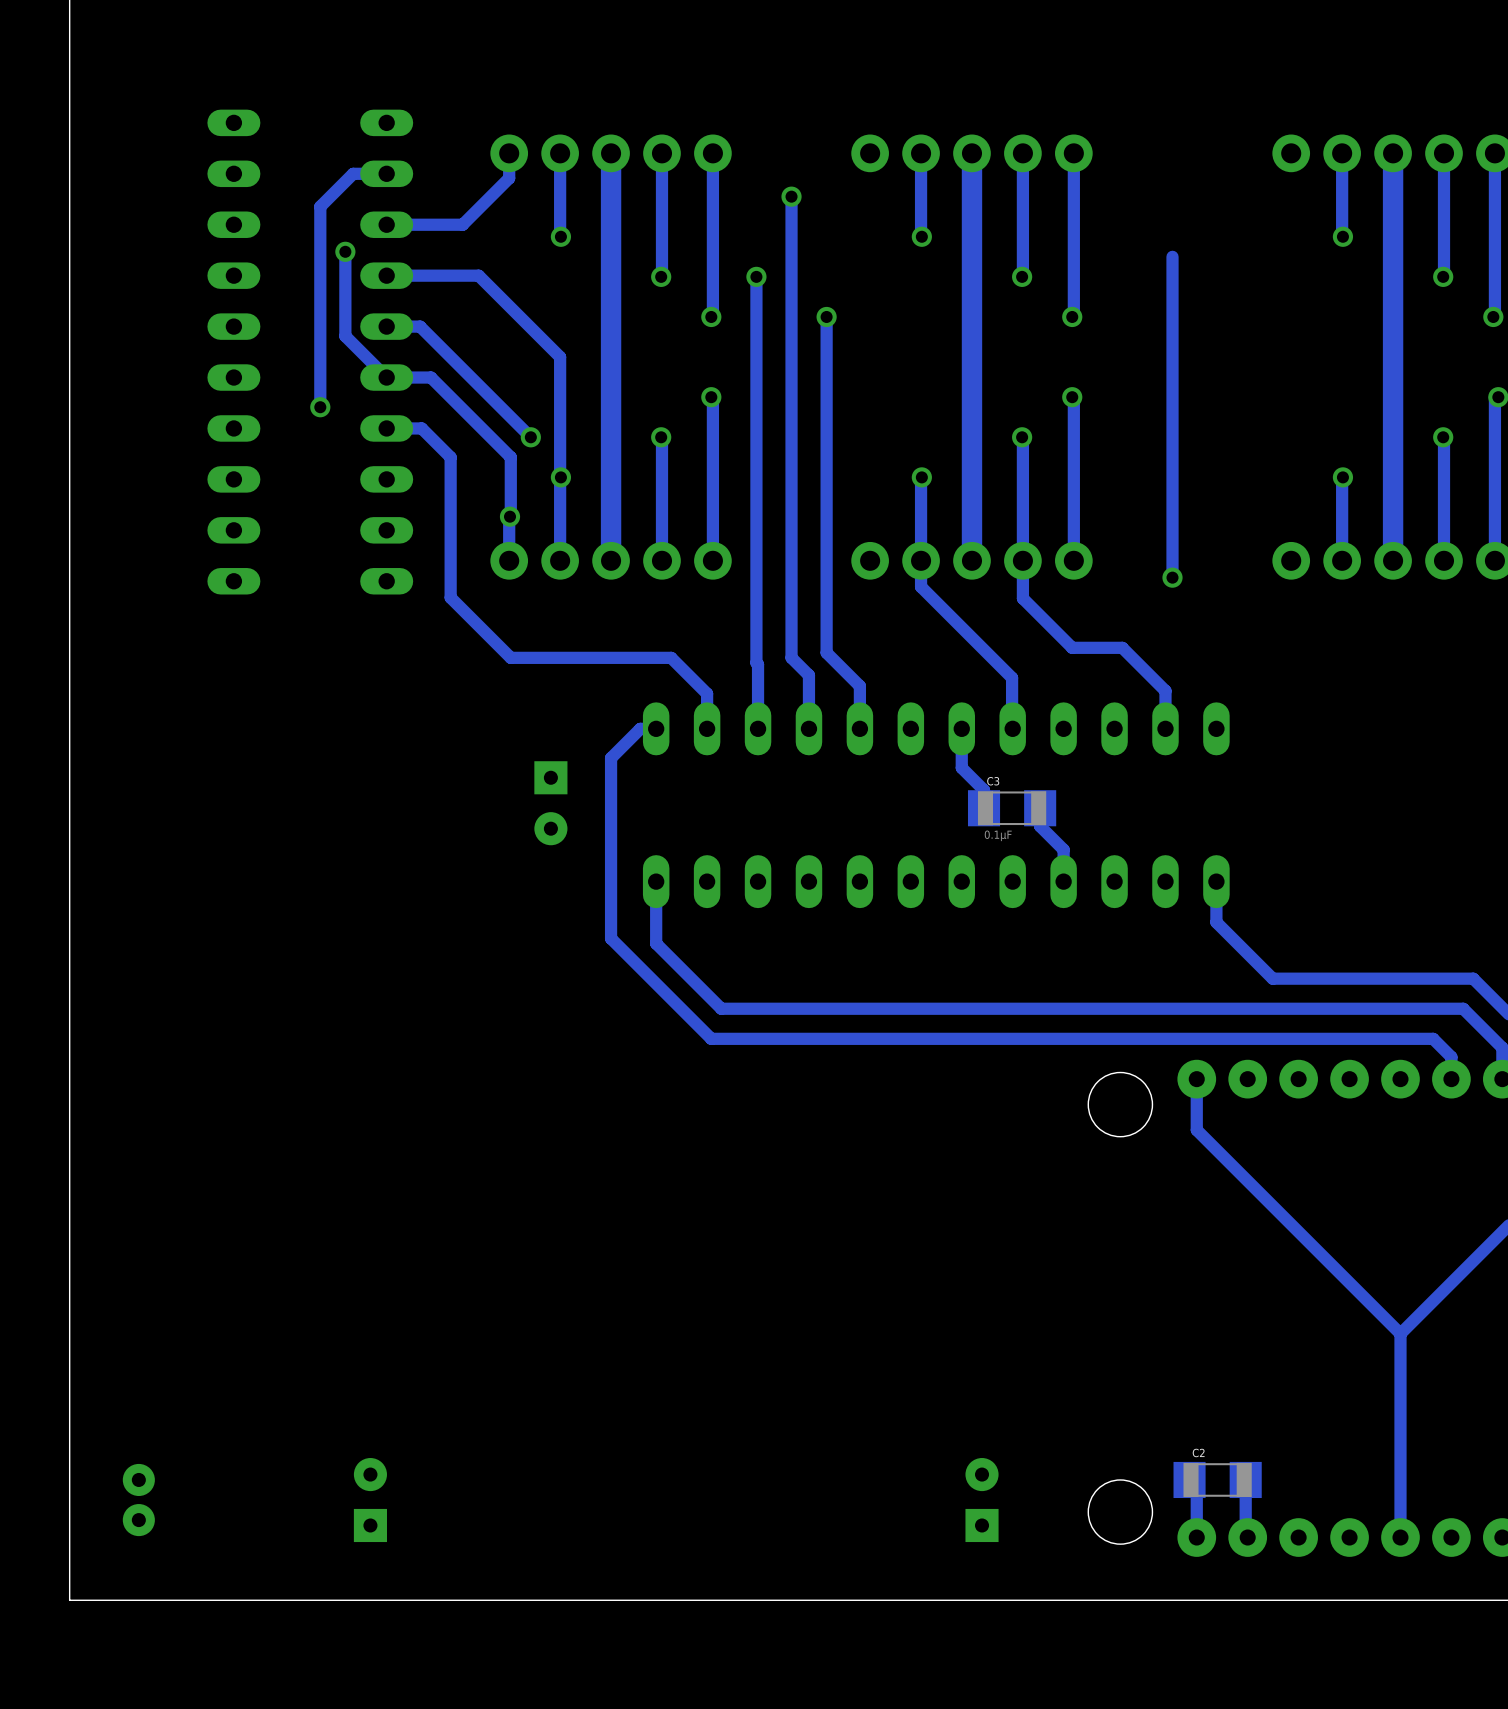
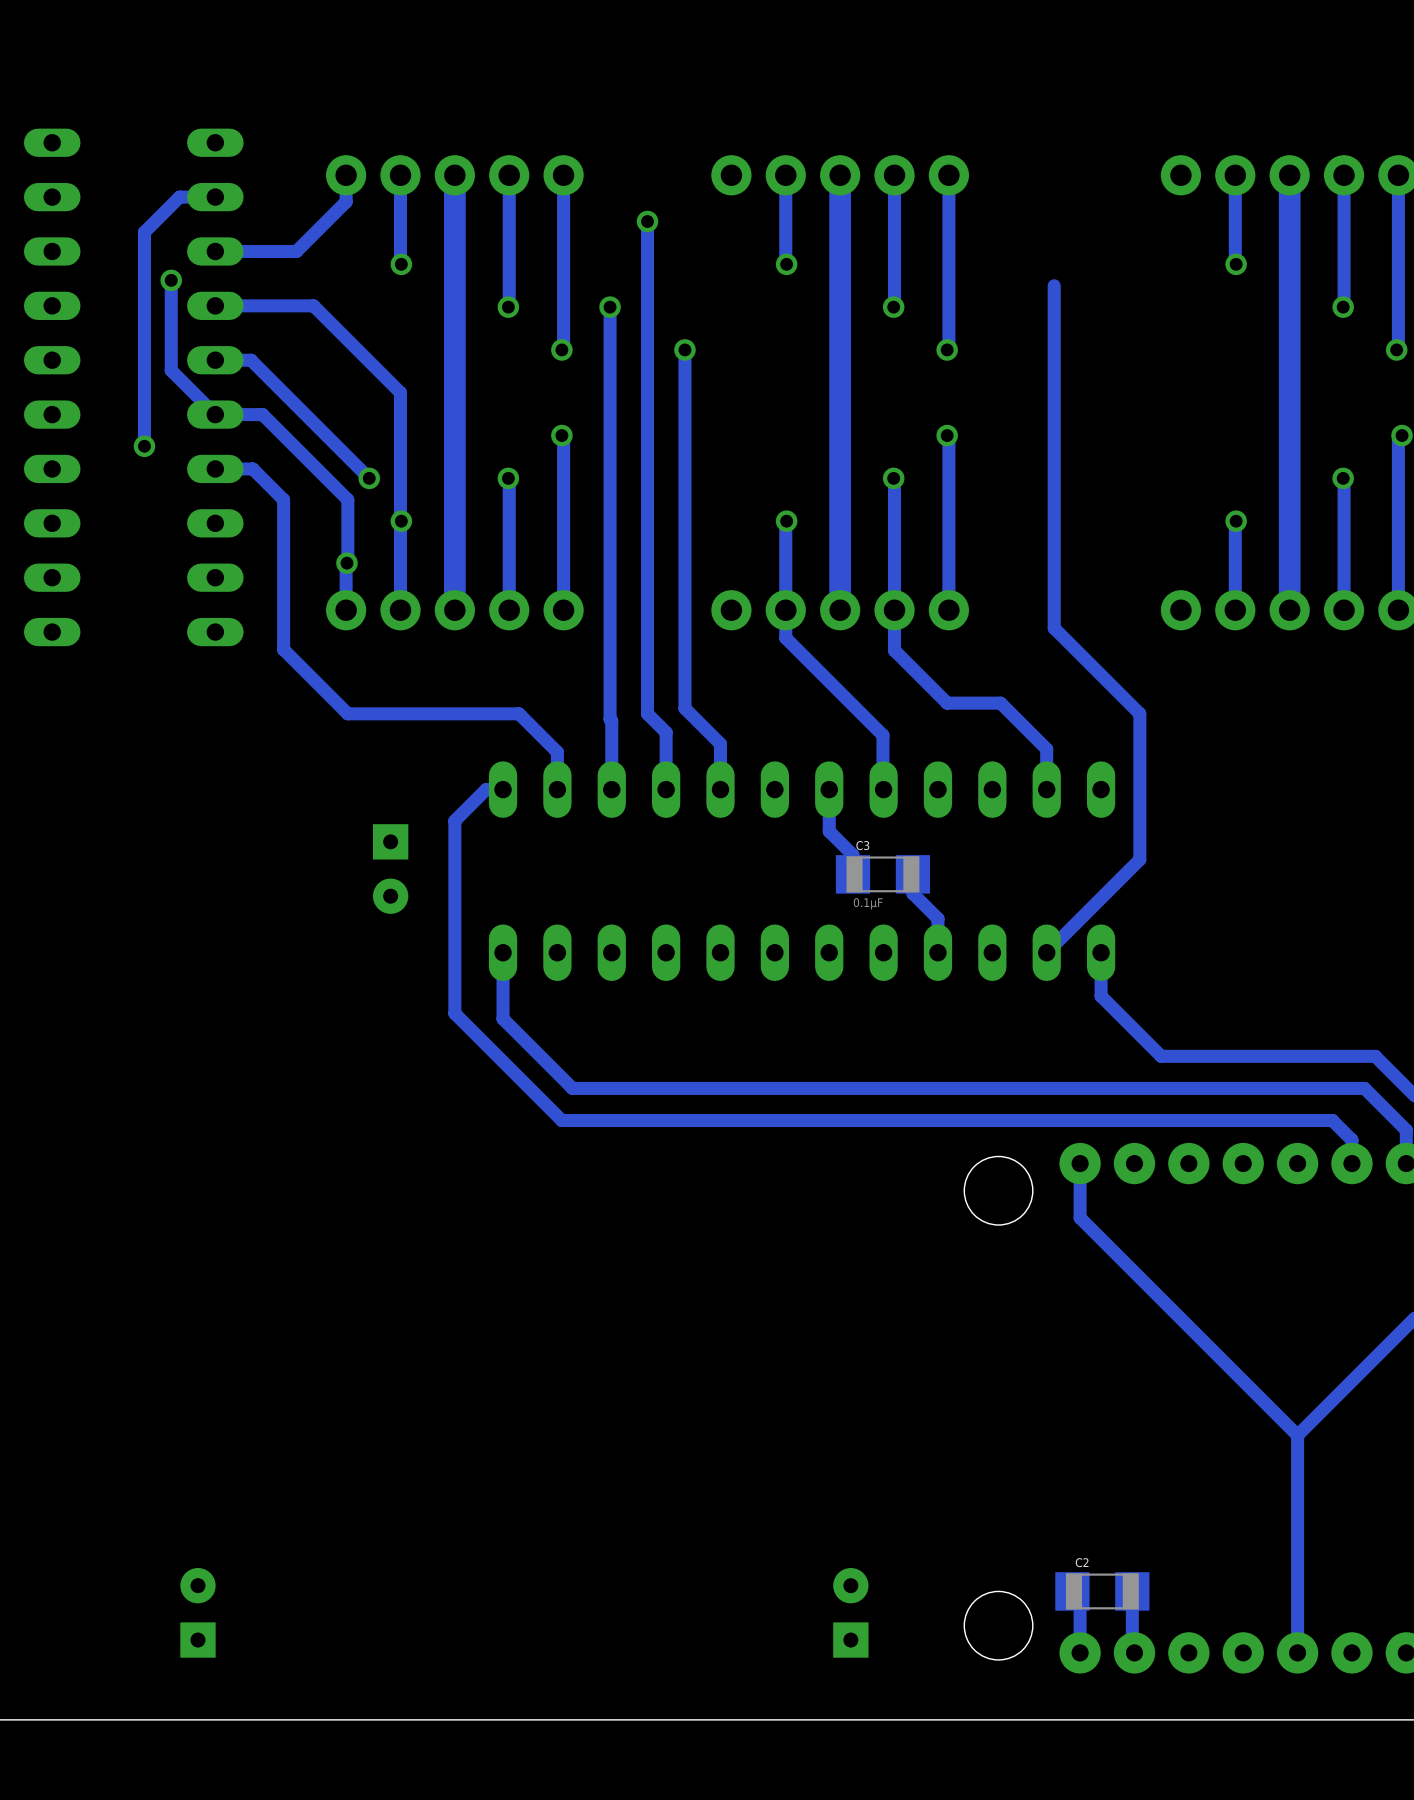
track: none -> (1054, 628) (1139, 713) (1139, 859) (1046, 952)
via: (1172, 577) -> none

